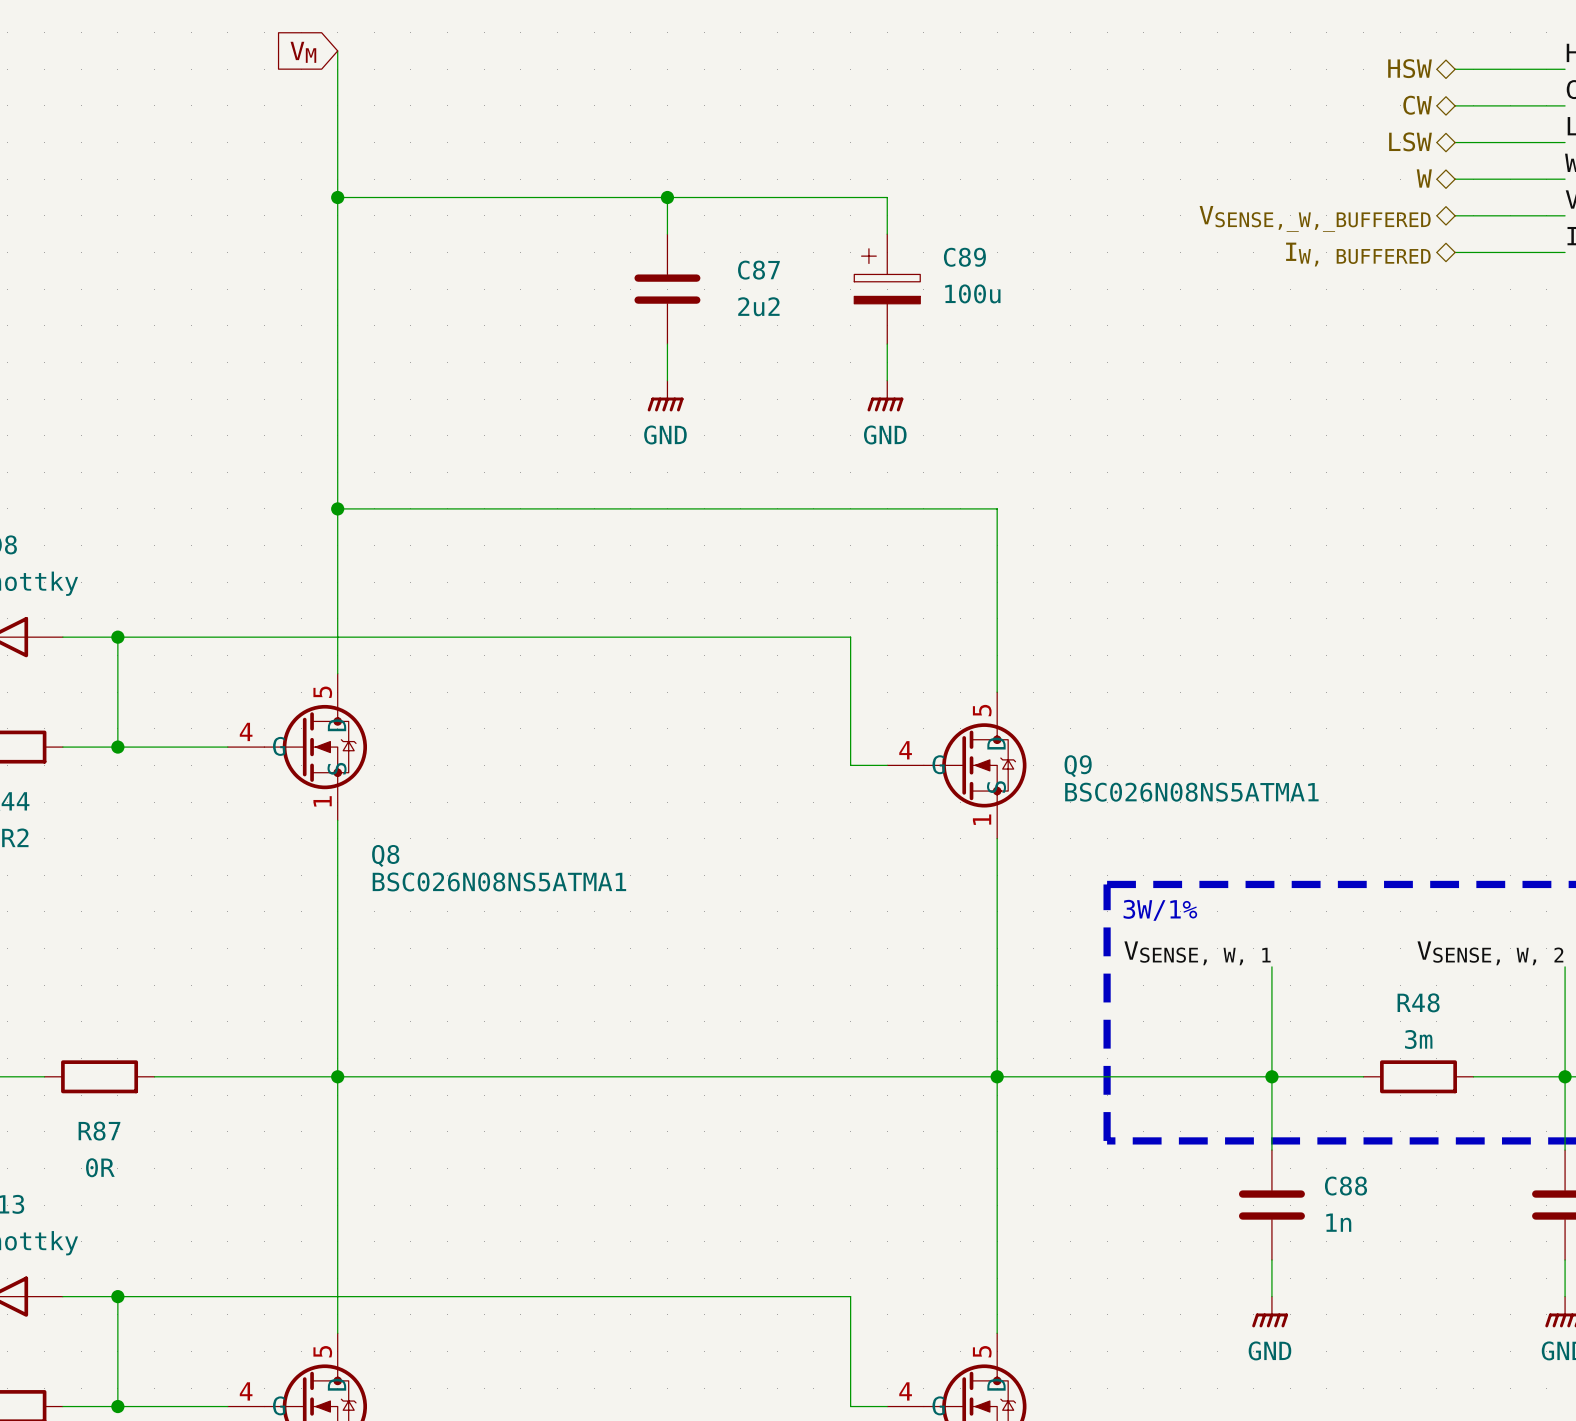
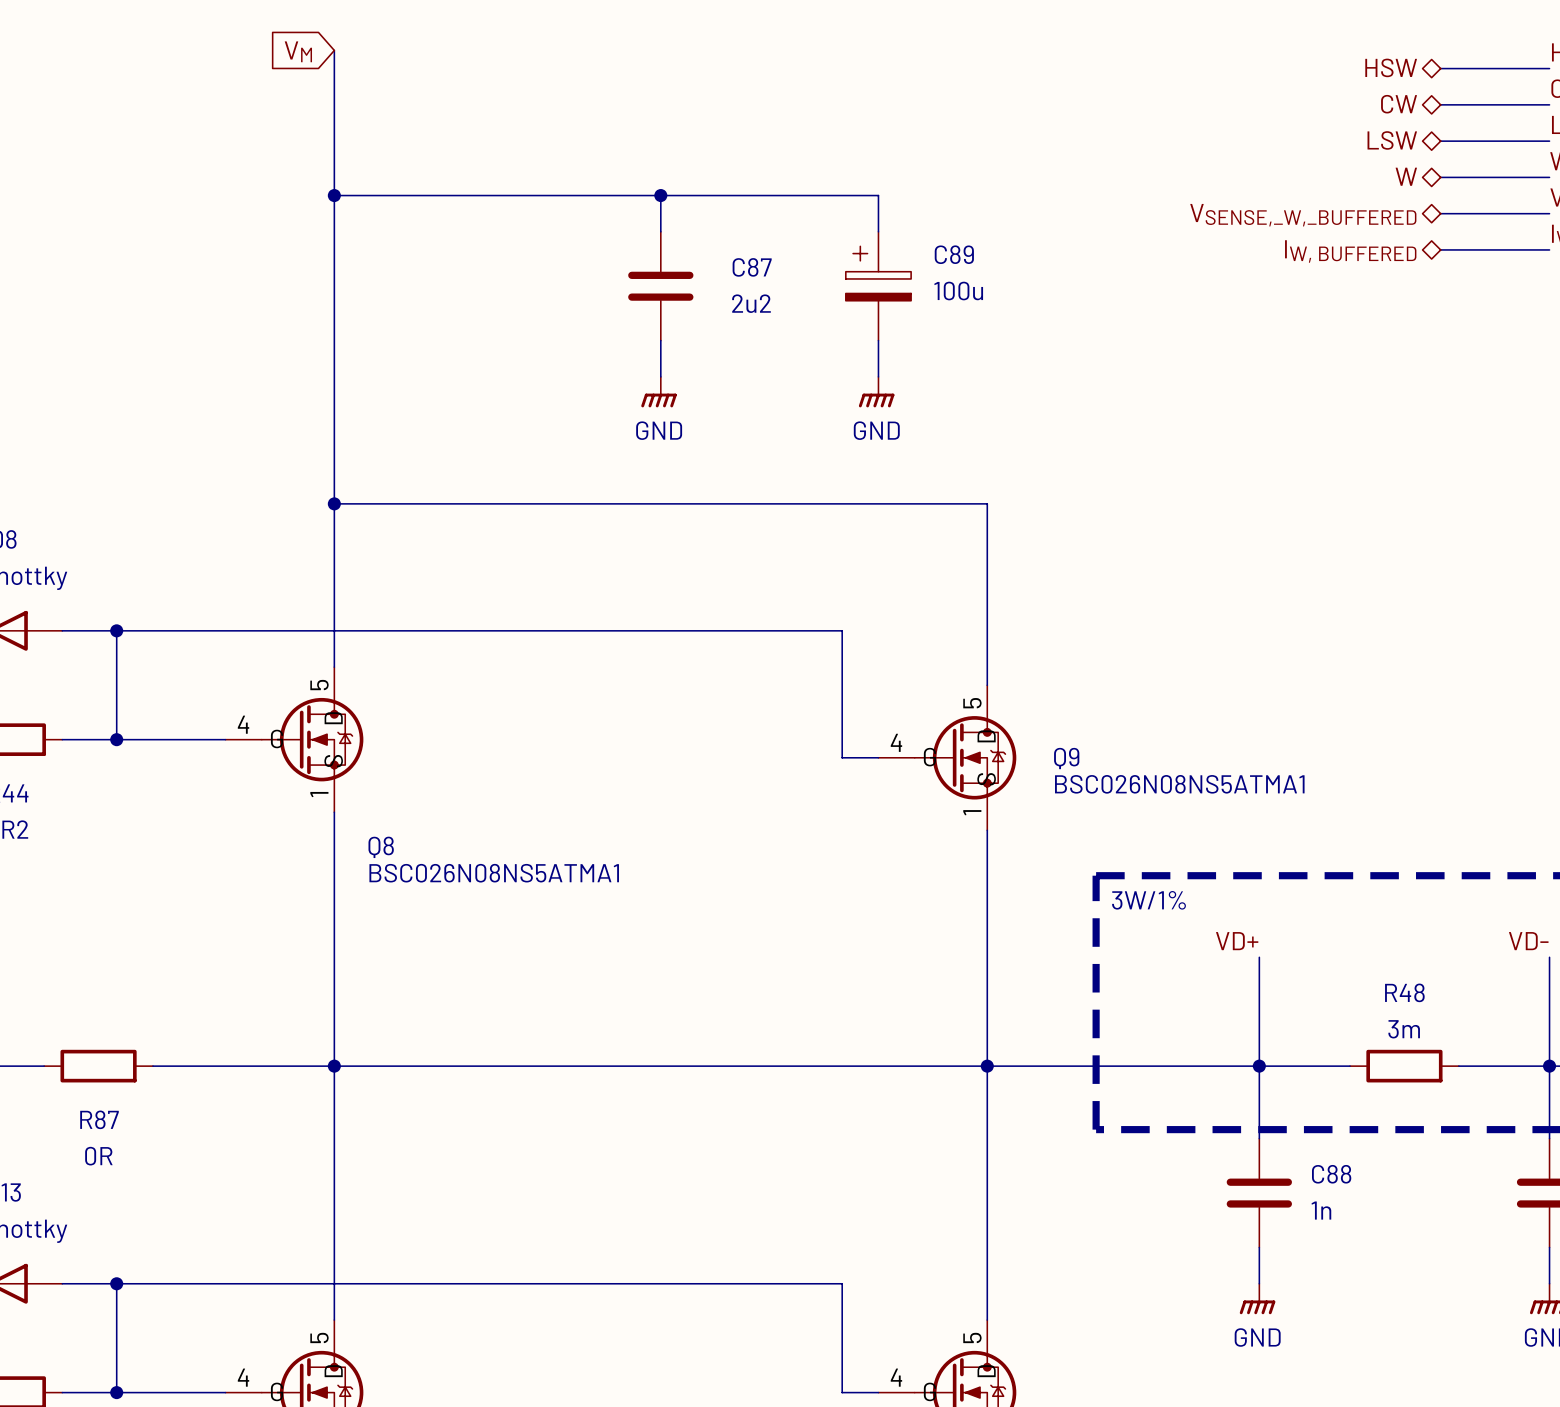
label: VSENSE, W, 1 (1197, 953) -> VD+ (1237, 941)
label: VSENSE, W, 2 (1490, 953) -> VD- (1528, 941)

